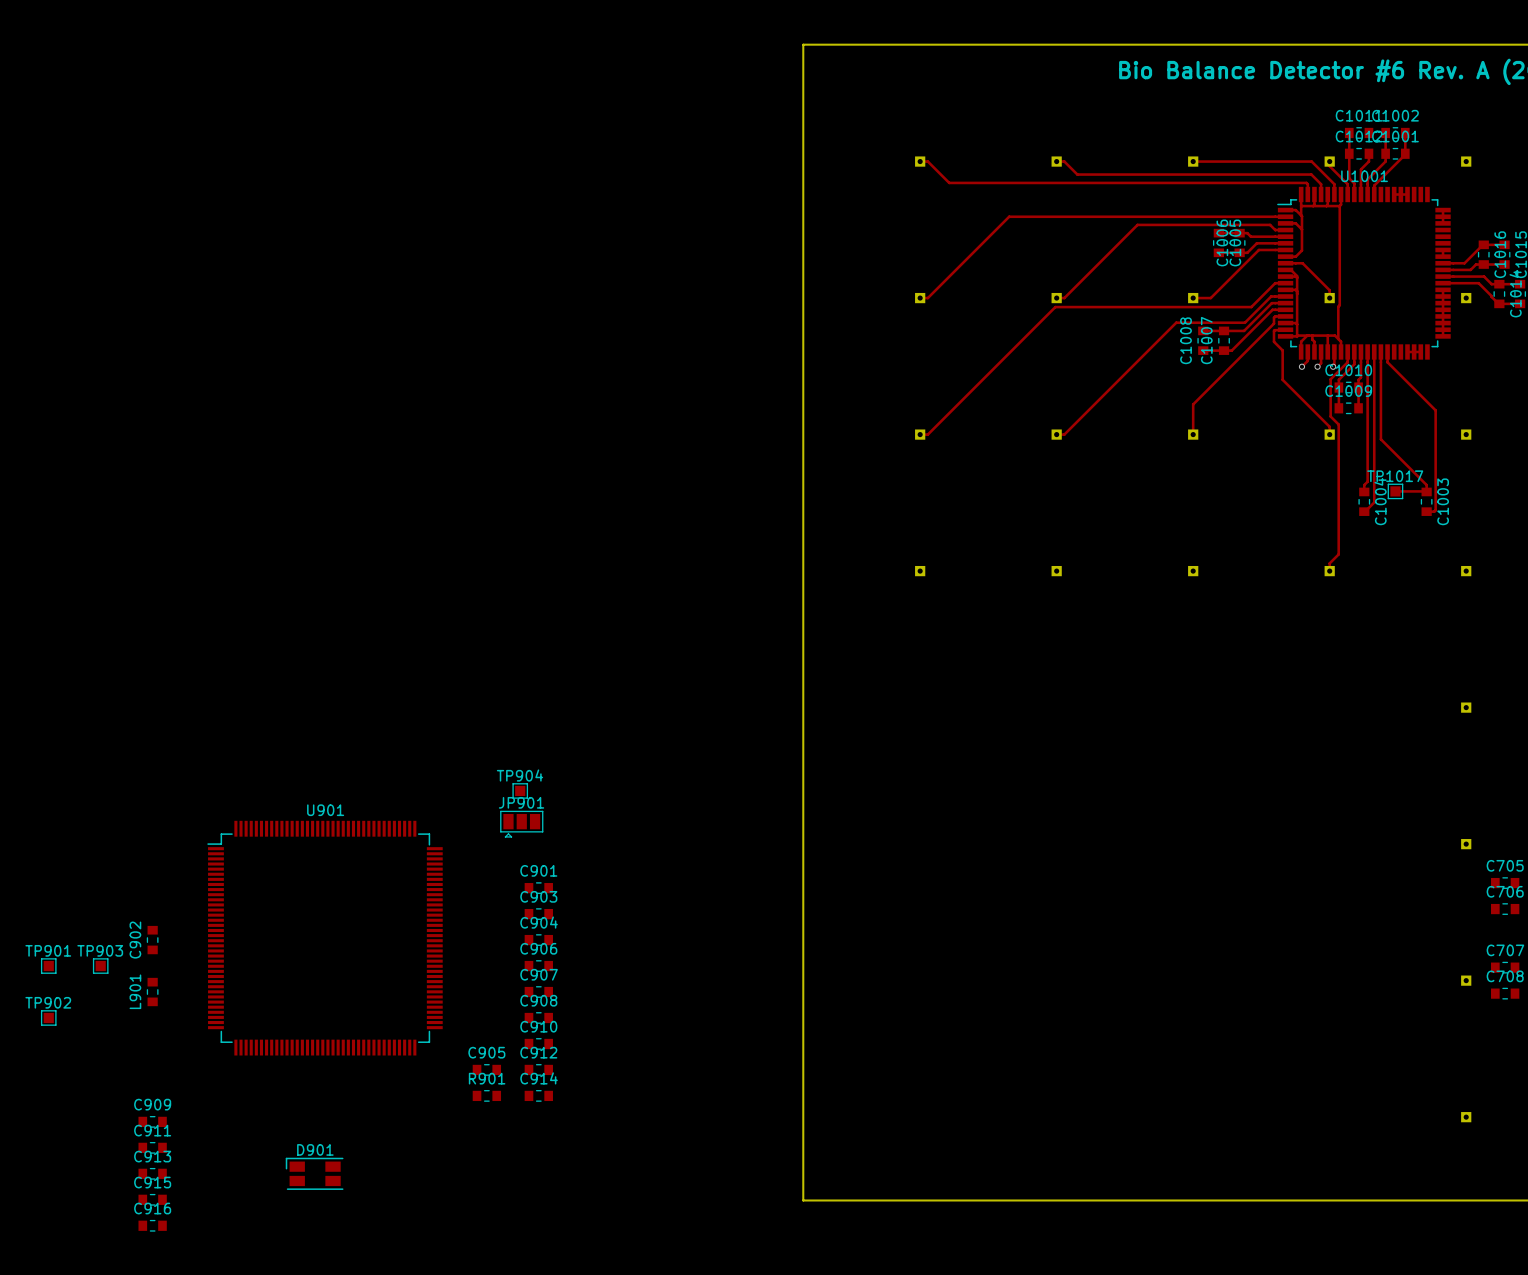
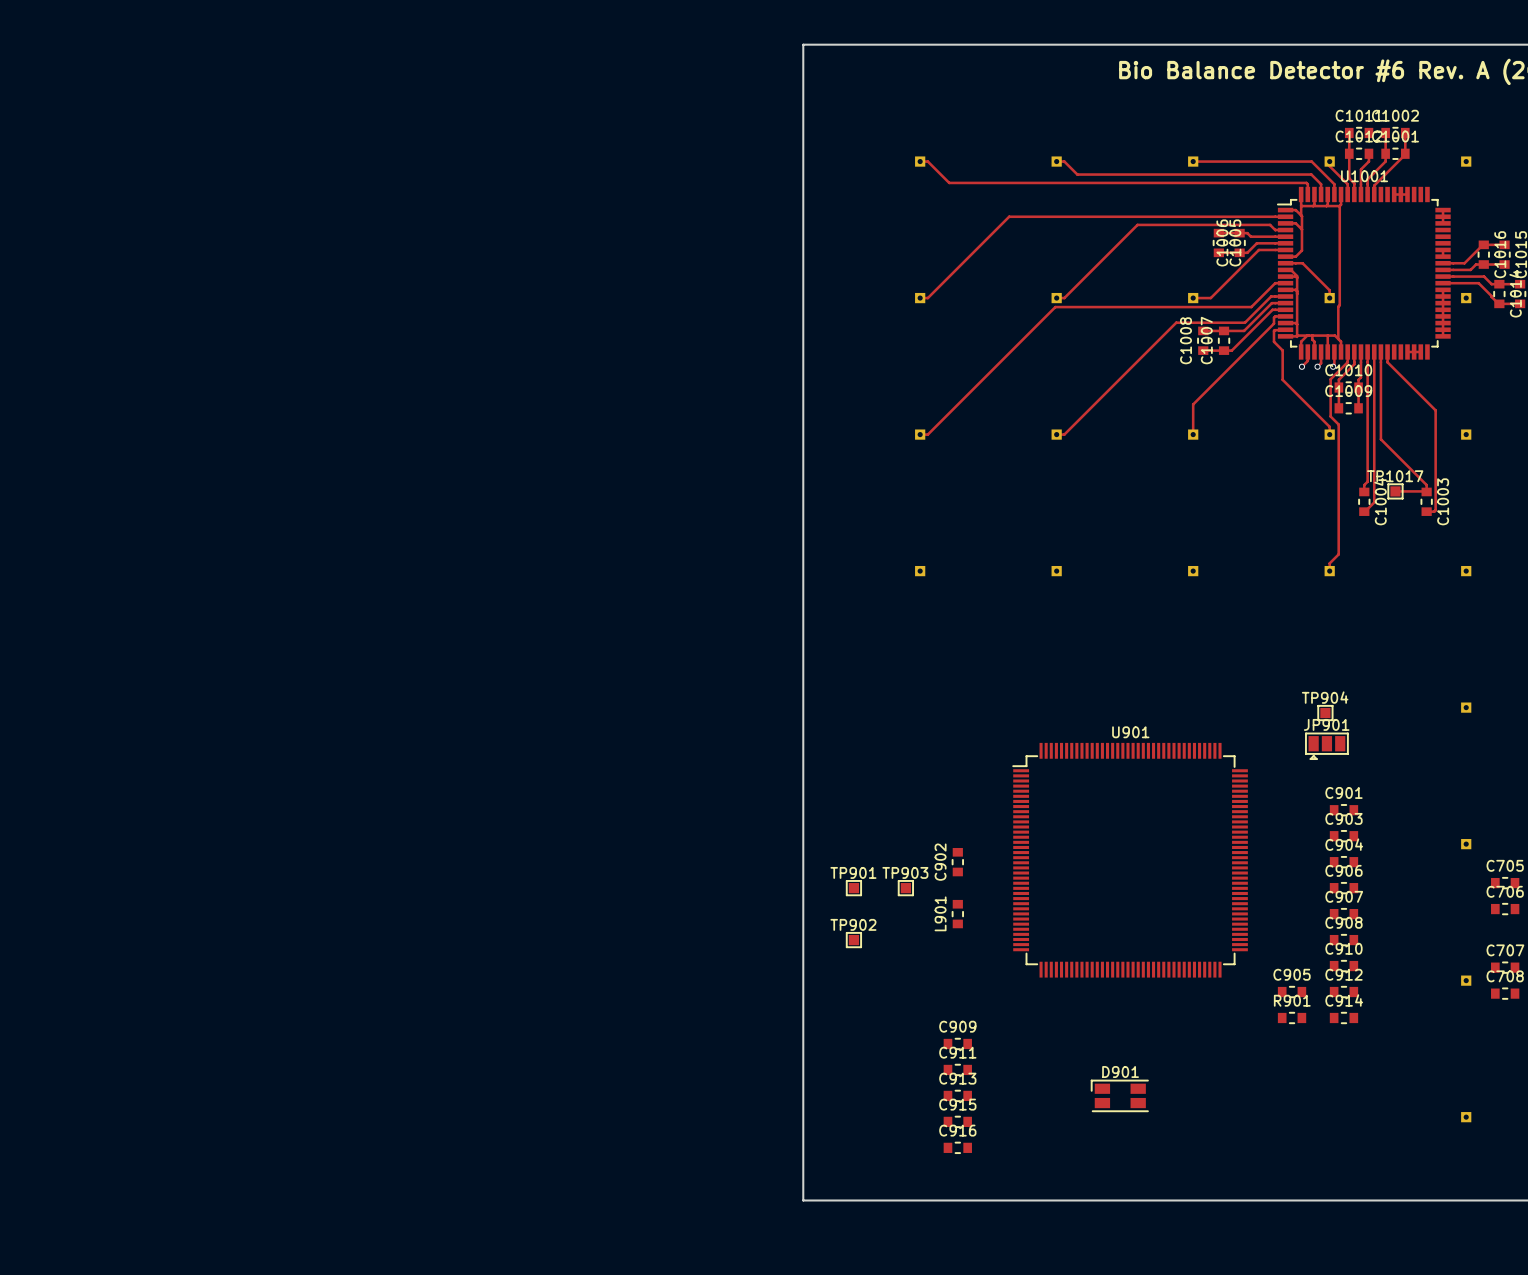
TP904 position: (520, 790) -> (1325, 713)
JP901 position: (521, 824) -> (1326, 746)
C901 position: (538, 888) -> (1343, 810)
C903 position: (538, 914) -> (1343, 836)
U901 position: (324, 938) -> (1130, 860)
C902 position: (152, 940) -> (957, 862)
C904 position: (538, 940) -> (1343, 862)
TP901 position: (48, 966) -> (853, 888)
TP903 position: (100, 966) -> (905, 888)
C906 position: (538, 966) -> (1343, 888)
L901 position: (152, 992) -> (957, 914)
C907 position: (538, 992) -> (1343, 914)
TP902 position: (48, 1017) -> (853, 940)
C908 position: (538, 1017) -> (1343, 940)
C910 position: (538, 1043) -> (1343, 966)
C905 position: (486, 1069) -> (1292, 992)
C912 position: (538, 1069) -> (1343, 992)
R901 position: (486, 1095) -> (1292, 1017)
C914 position: (538, 1095) -> (1343, 1017)
C909 position: (152, 1121) -> (957, 1043)
C911 position: (152, 1147) -> (957, 1069)
C913 position: (152, 1173) -> (957, 1095)
D901 position: (314, 1173) -> (1119, 1095)
C915 position: (152, 1199) -> (957, 1121)
C916 position: (152, 1225) -> (957, 1147)

